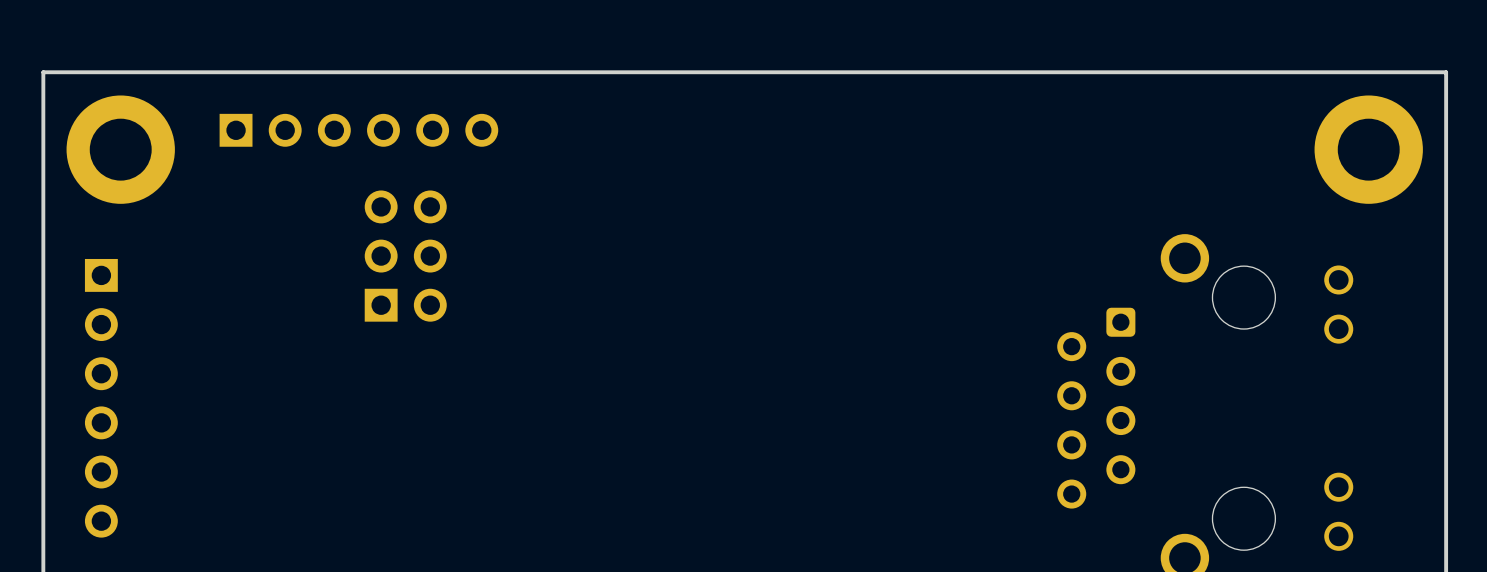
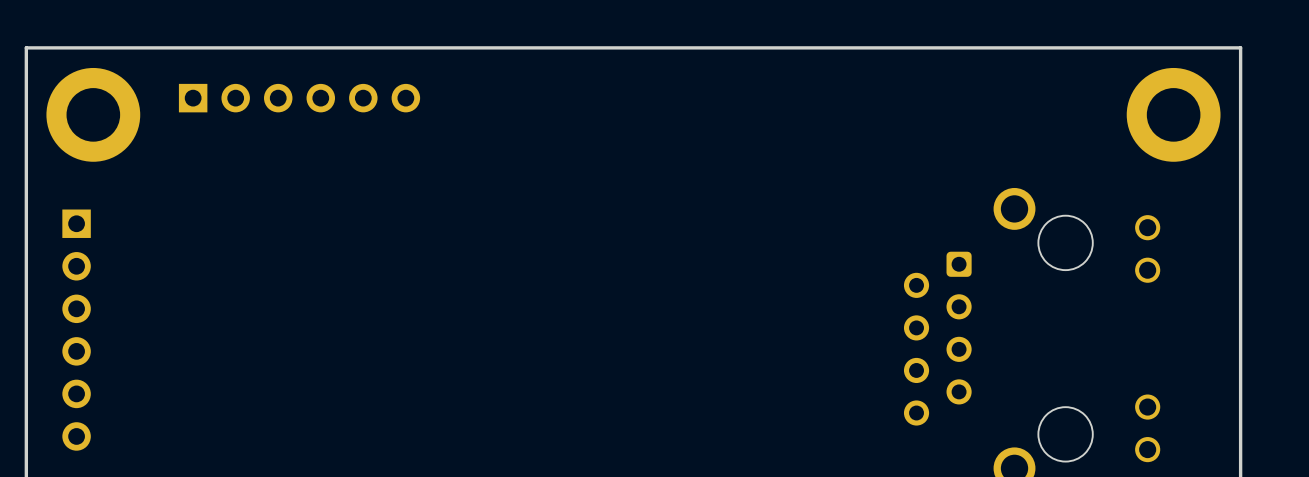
part: (405, 256) -> none

